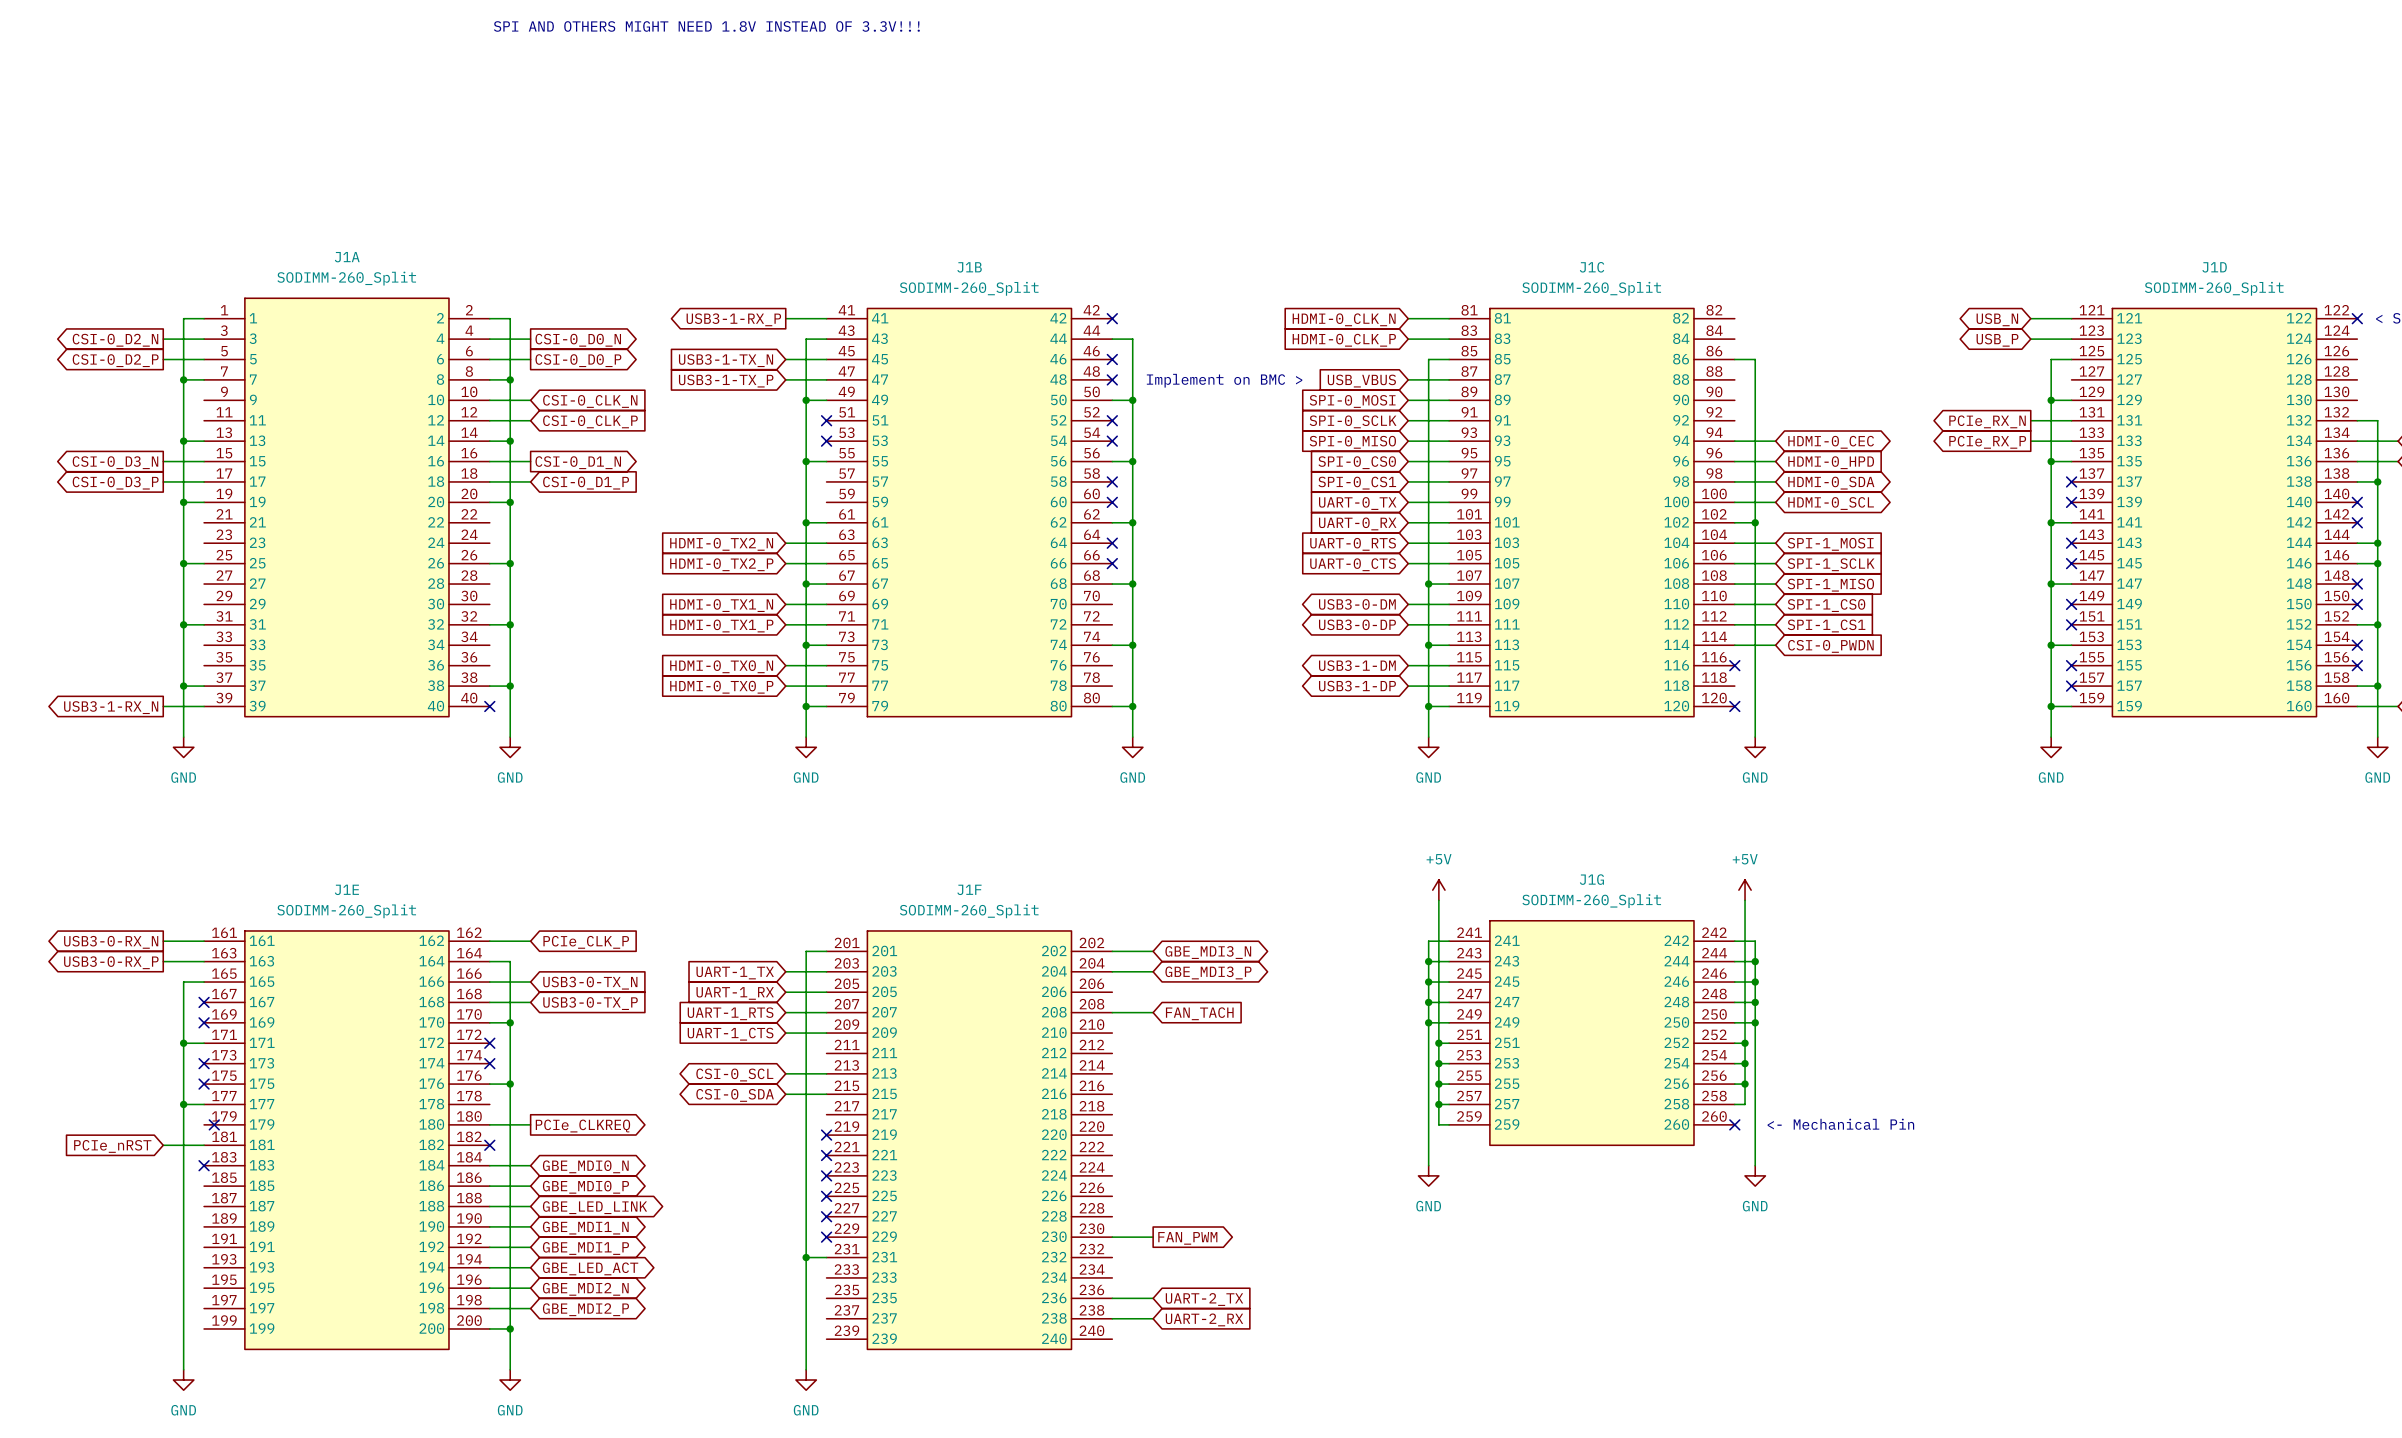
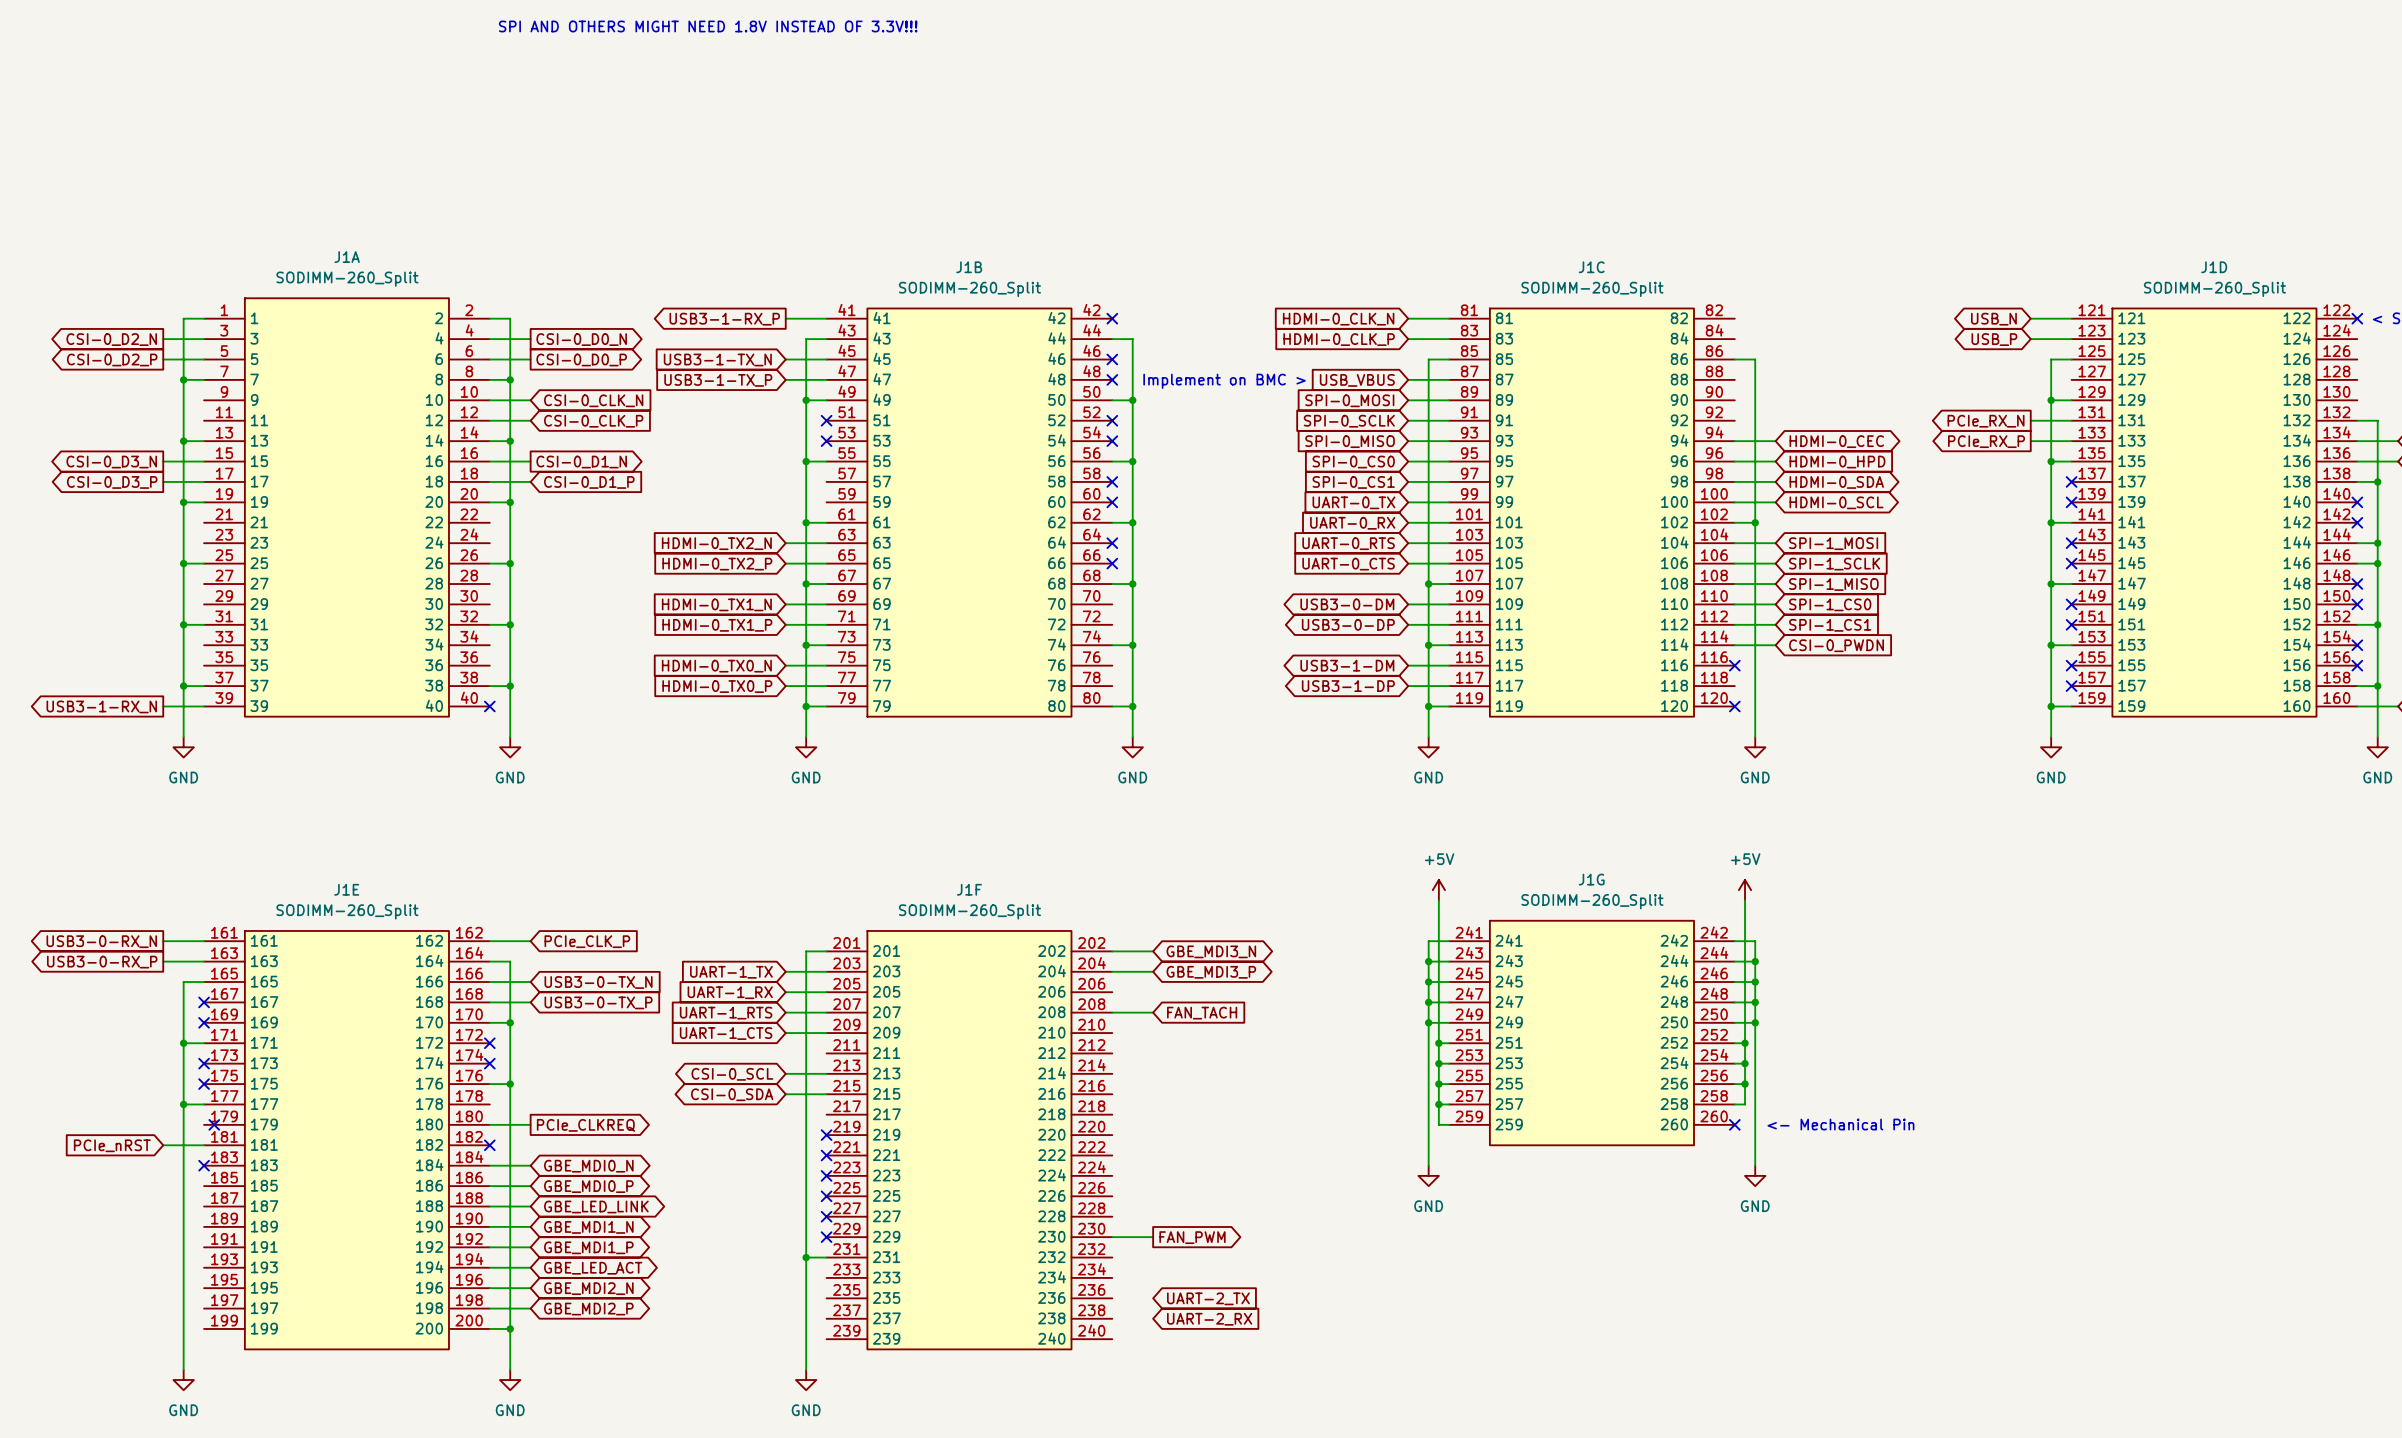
wire: (1112, 1298) (1153, 1298) -> none
wire: (1112, 1318) (1153, 1318) -> none

